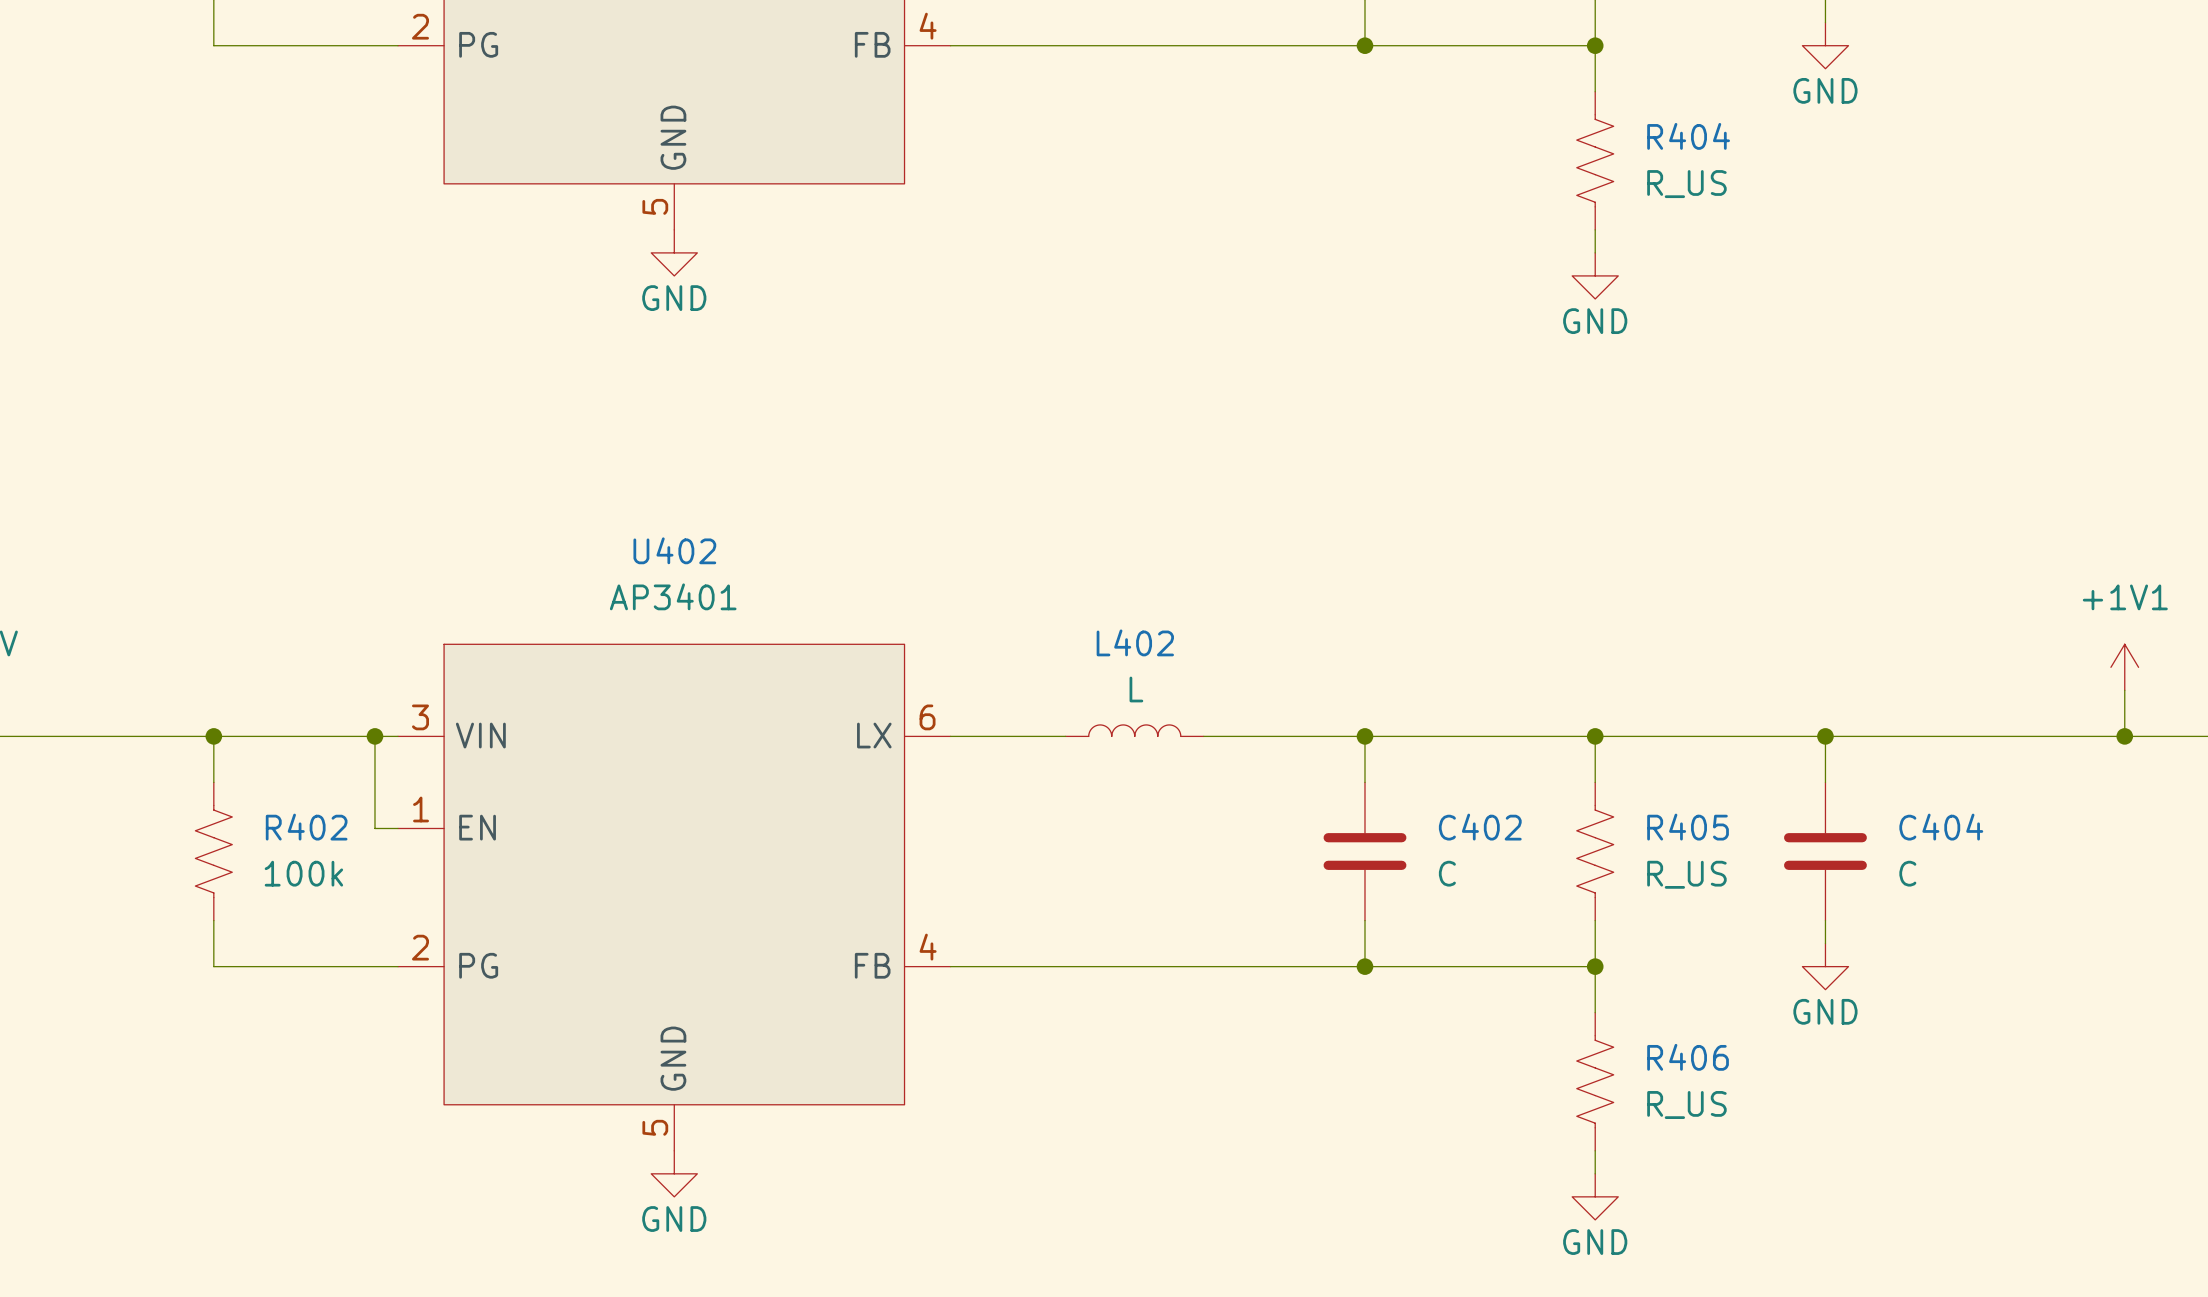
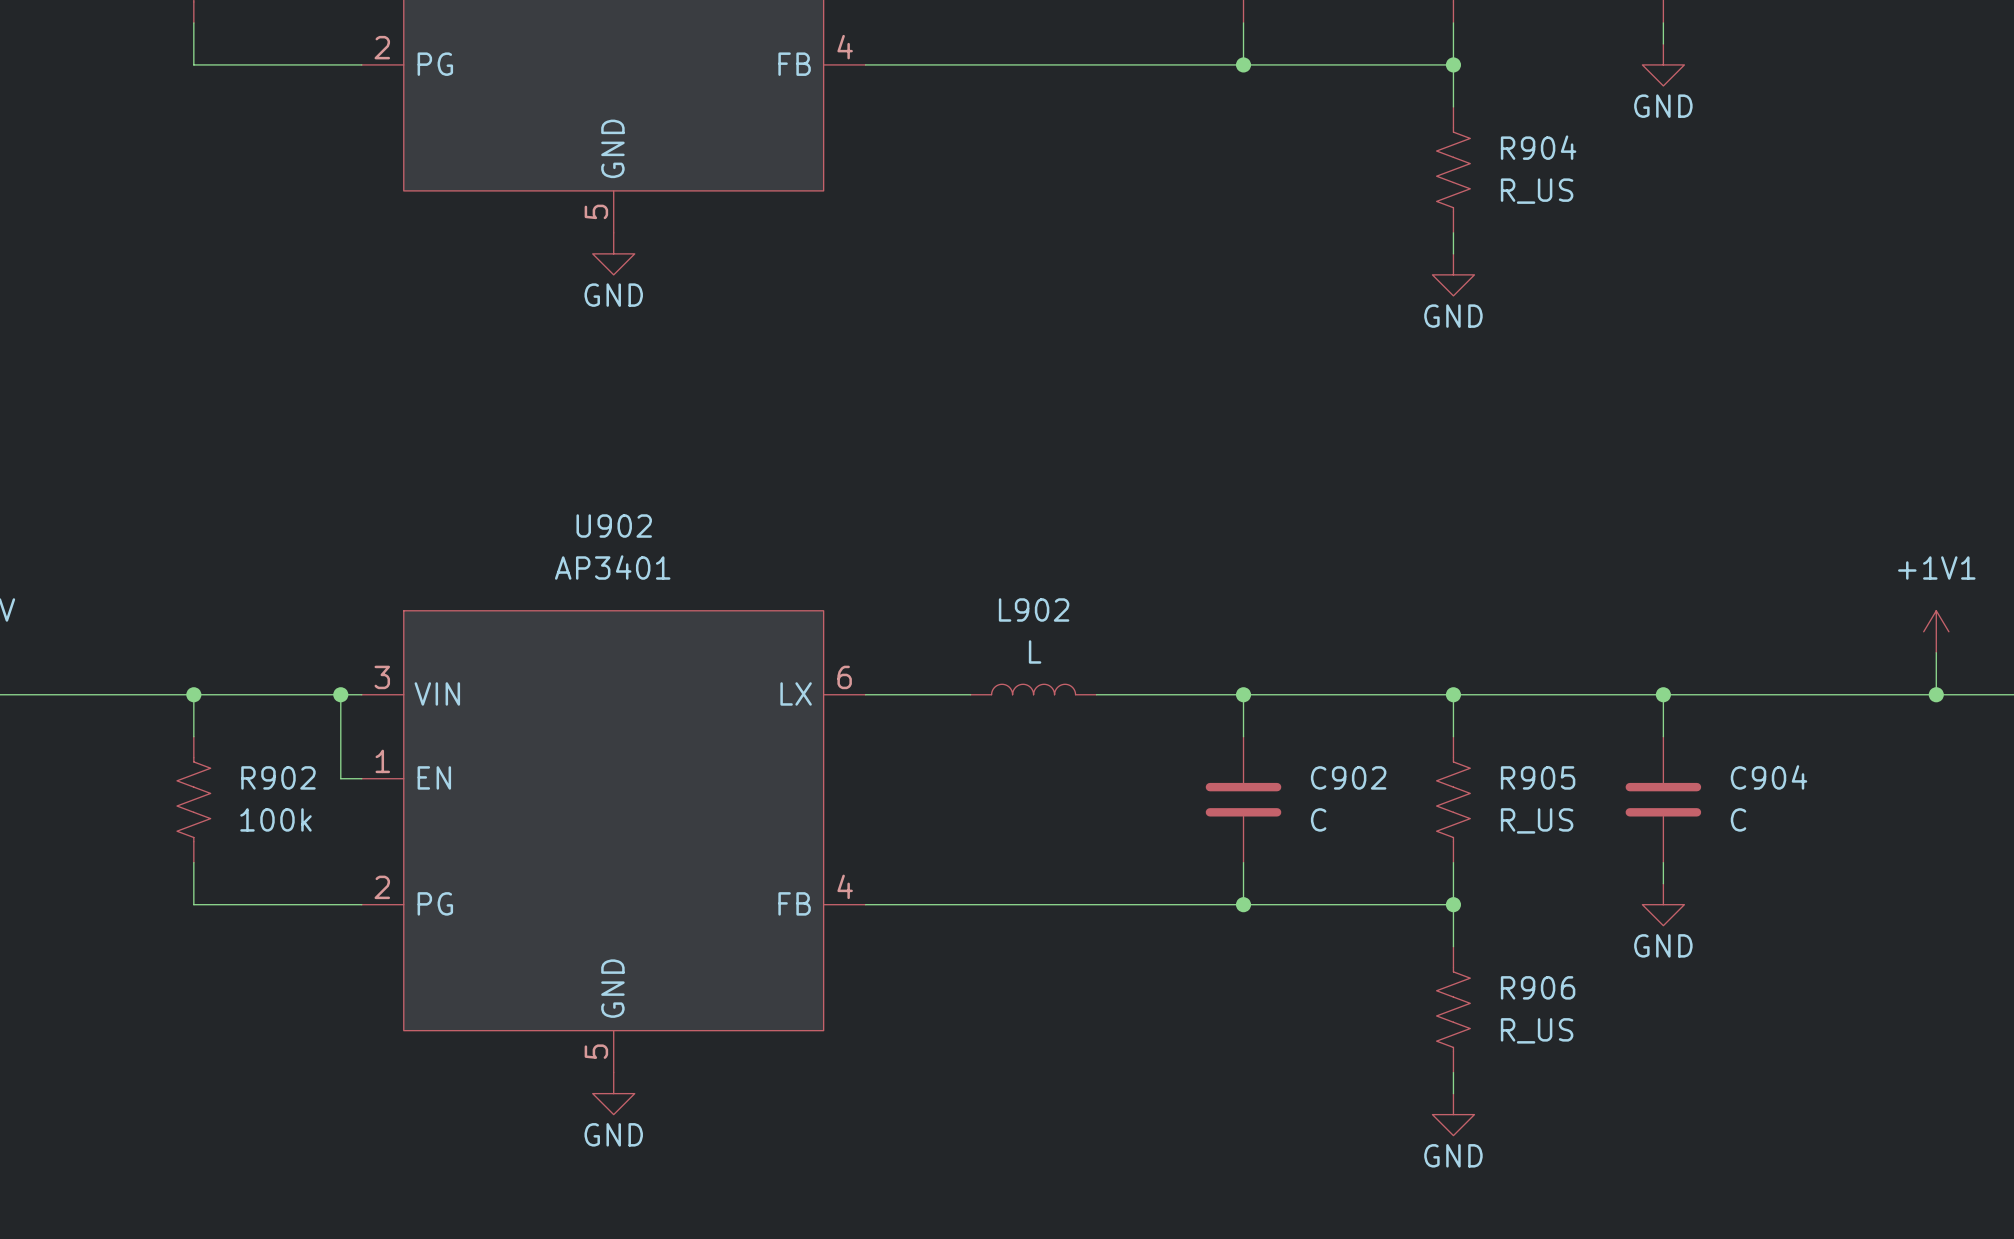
R404 name: R404 (1688, 136) -> R904 (1538, 147)
U402 name: U402 (674, 550) -> U902 (614, 526)
L402 name: L402 (1135, 642) -> L902 (1034, 609)
R402 name: R402 (306, 827) -> R902 (278, 777)
C402 name: C402 (1480, 827) -> C902 (1348, 777)
R405 name: R405 (1688, 827) -> R905 (1538, 777)
C404 name: C404 (1941, 827) -> C904 (1769, 777)
R406 name: R406 (1688, 1057) -> R906 (1538, 987)

